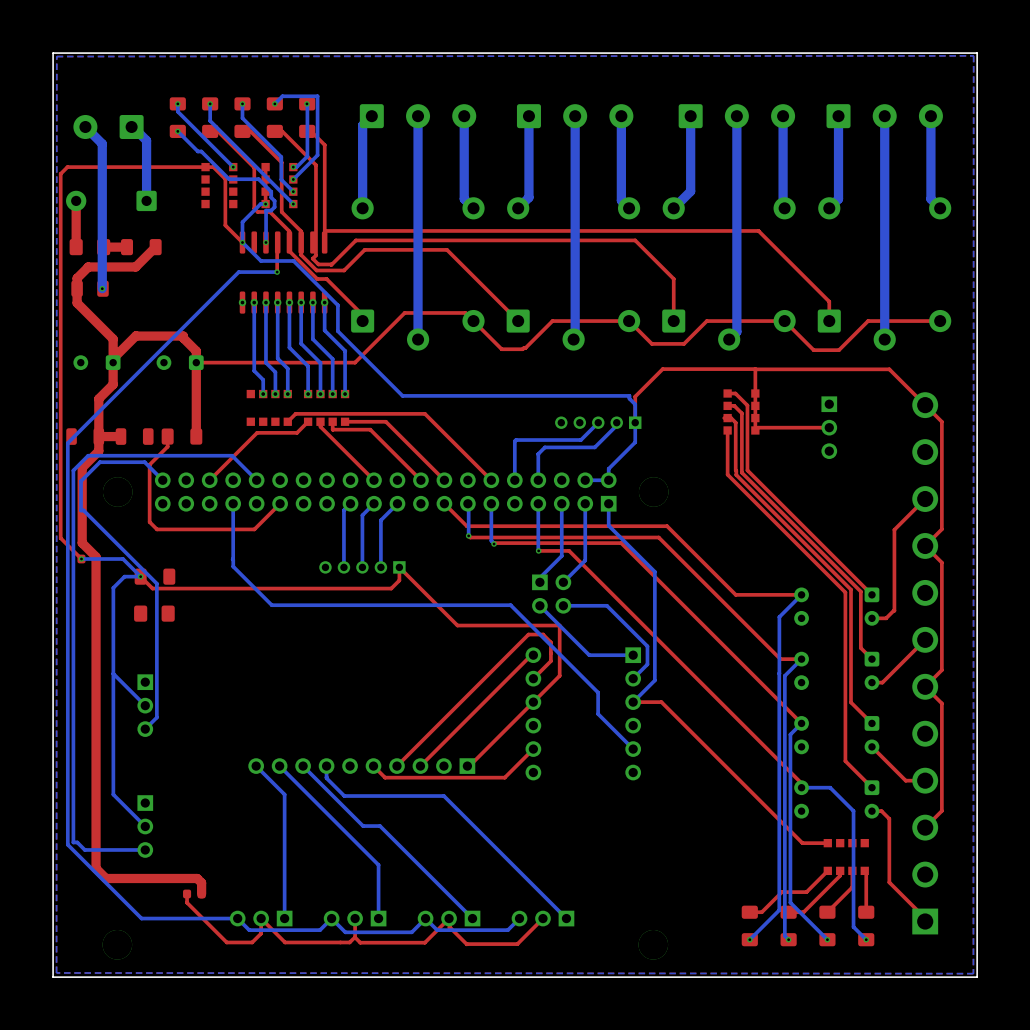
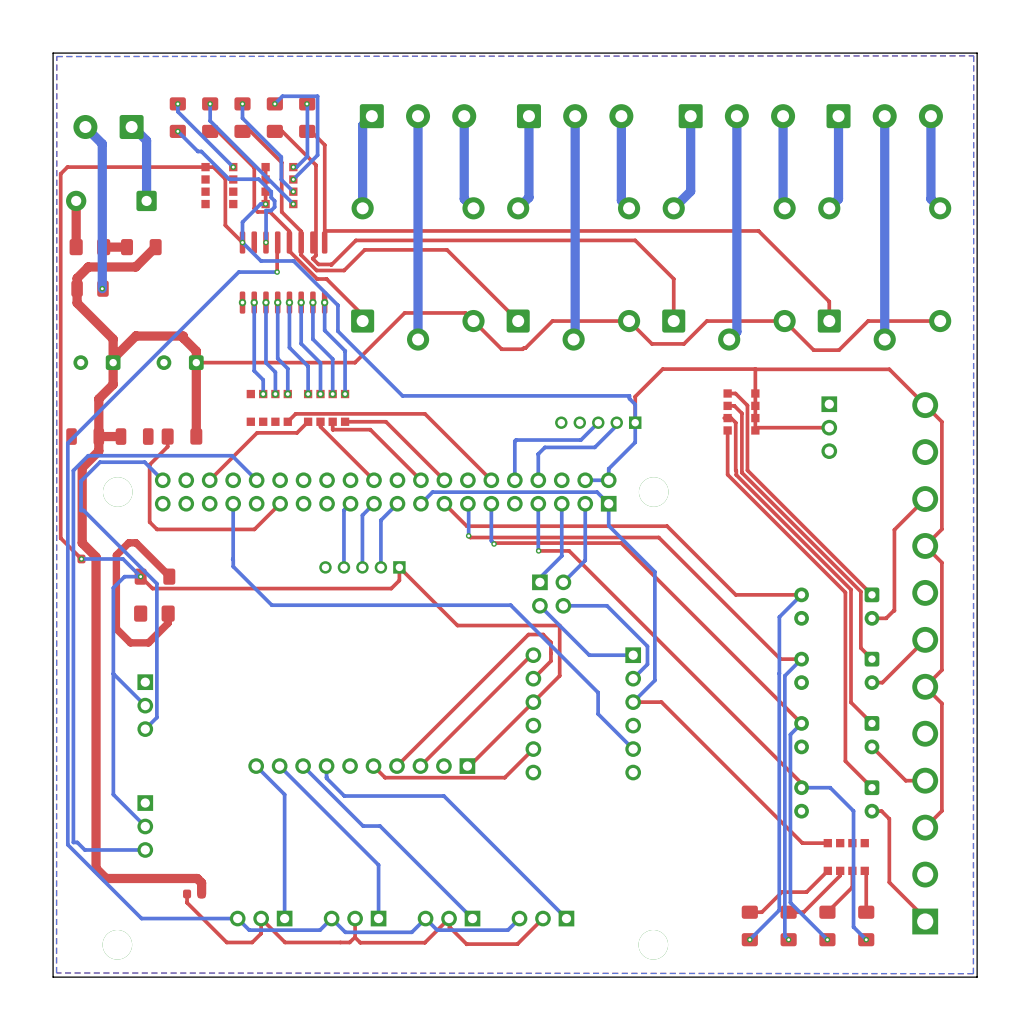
bottom track: none -> (608, 503) (597, 492) (432, 492) (420, 503)
top track: none -> (169, 576) (136, 542) (128, 542) (116, 555) (116, 628) (130, 642) (148, 642) (168, 623) (168, 613)

